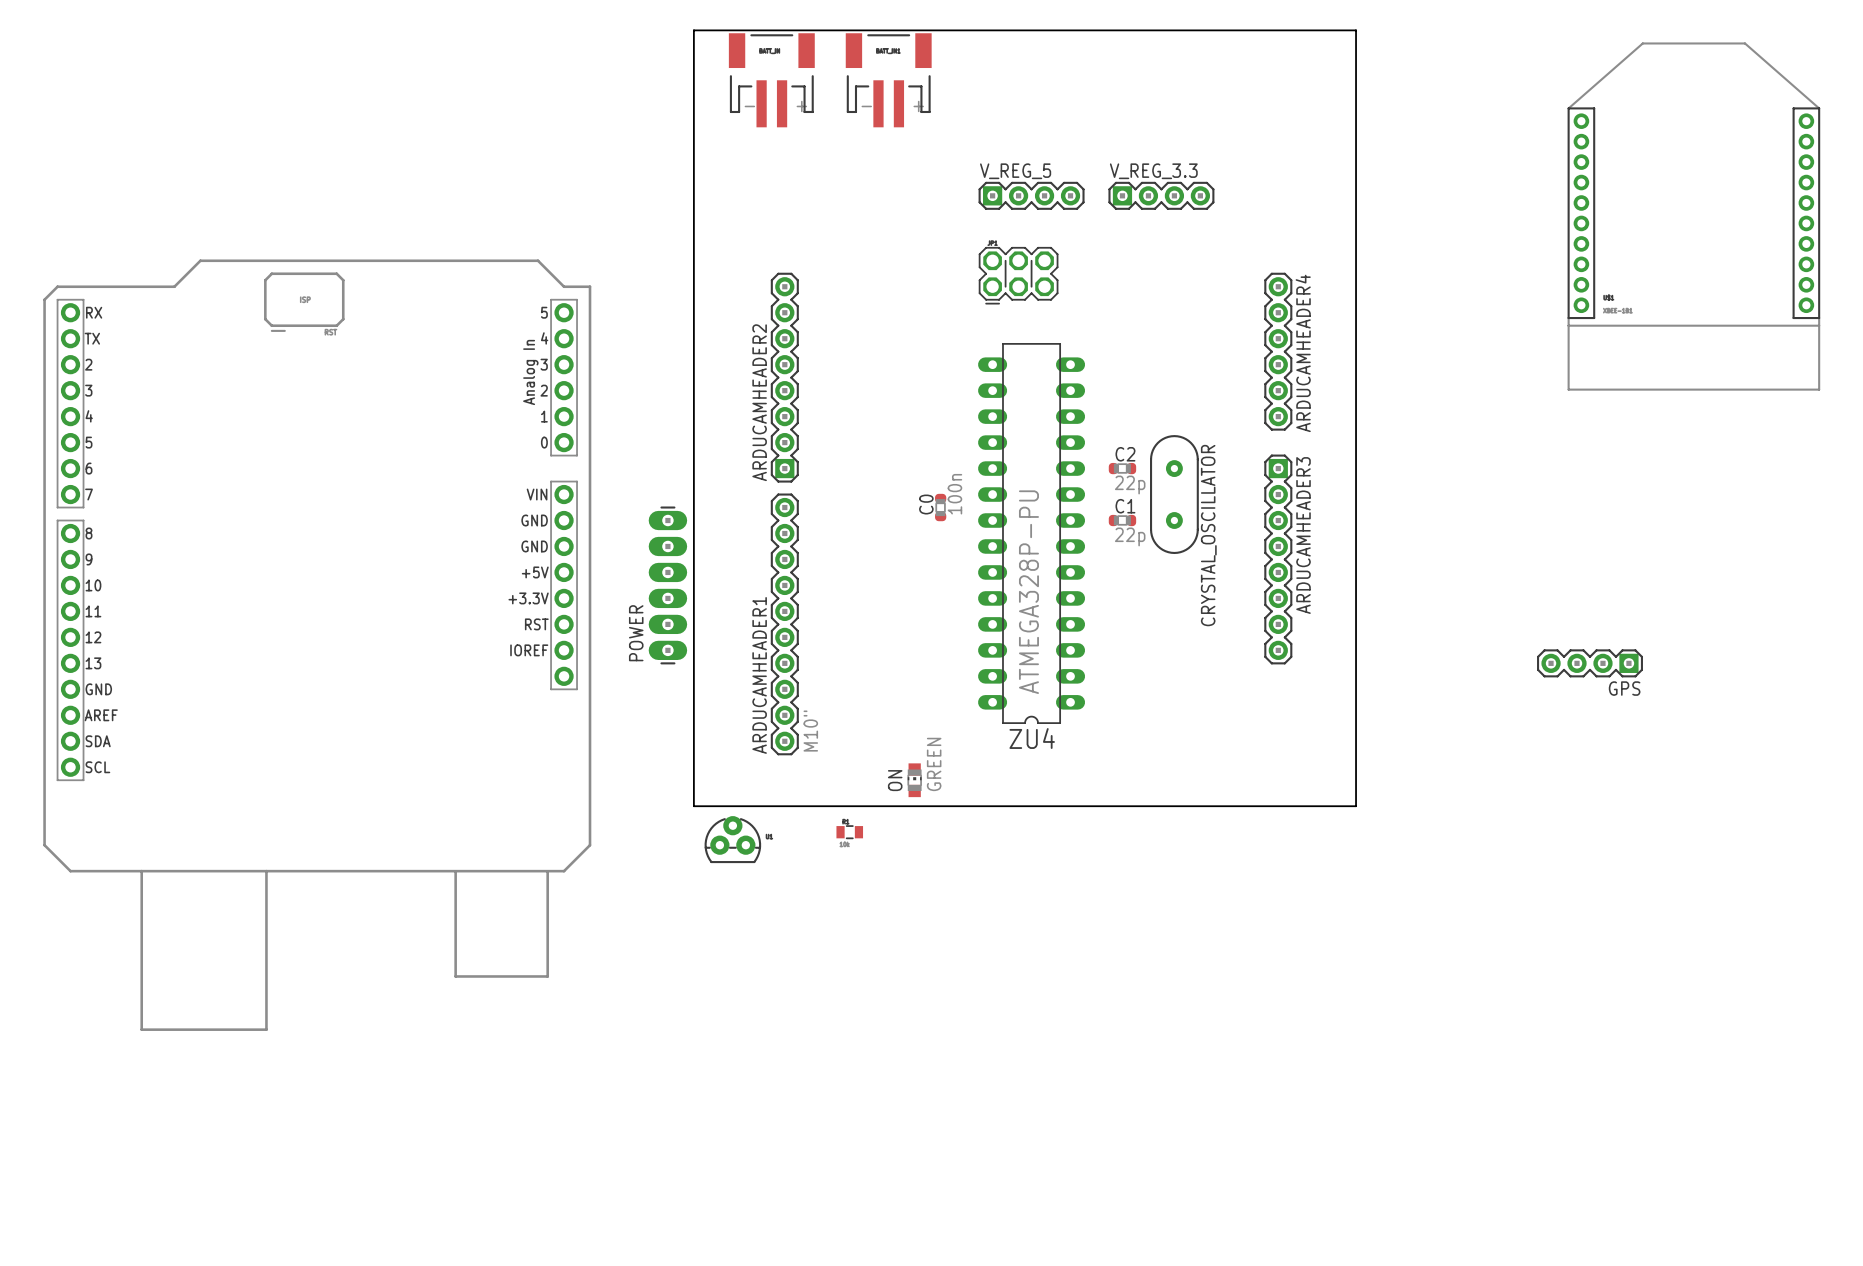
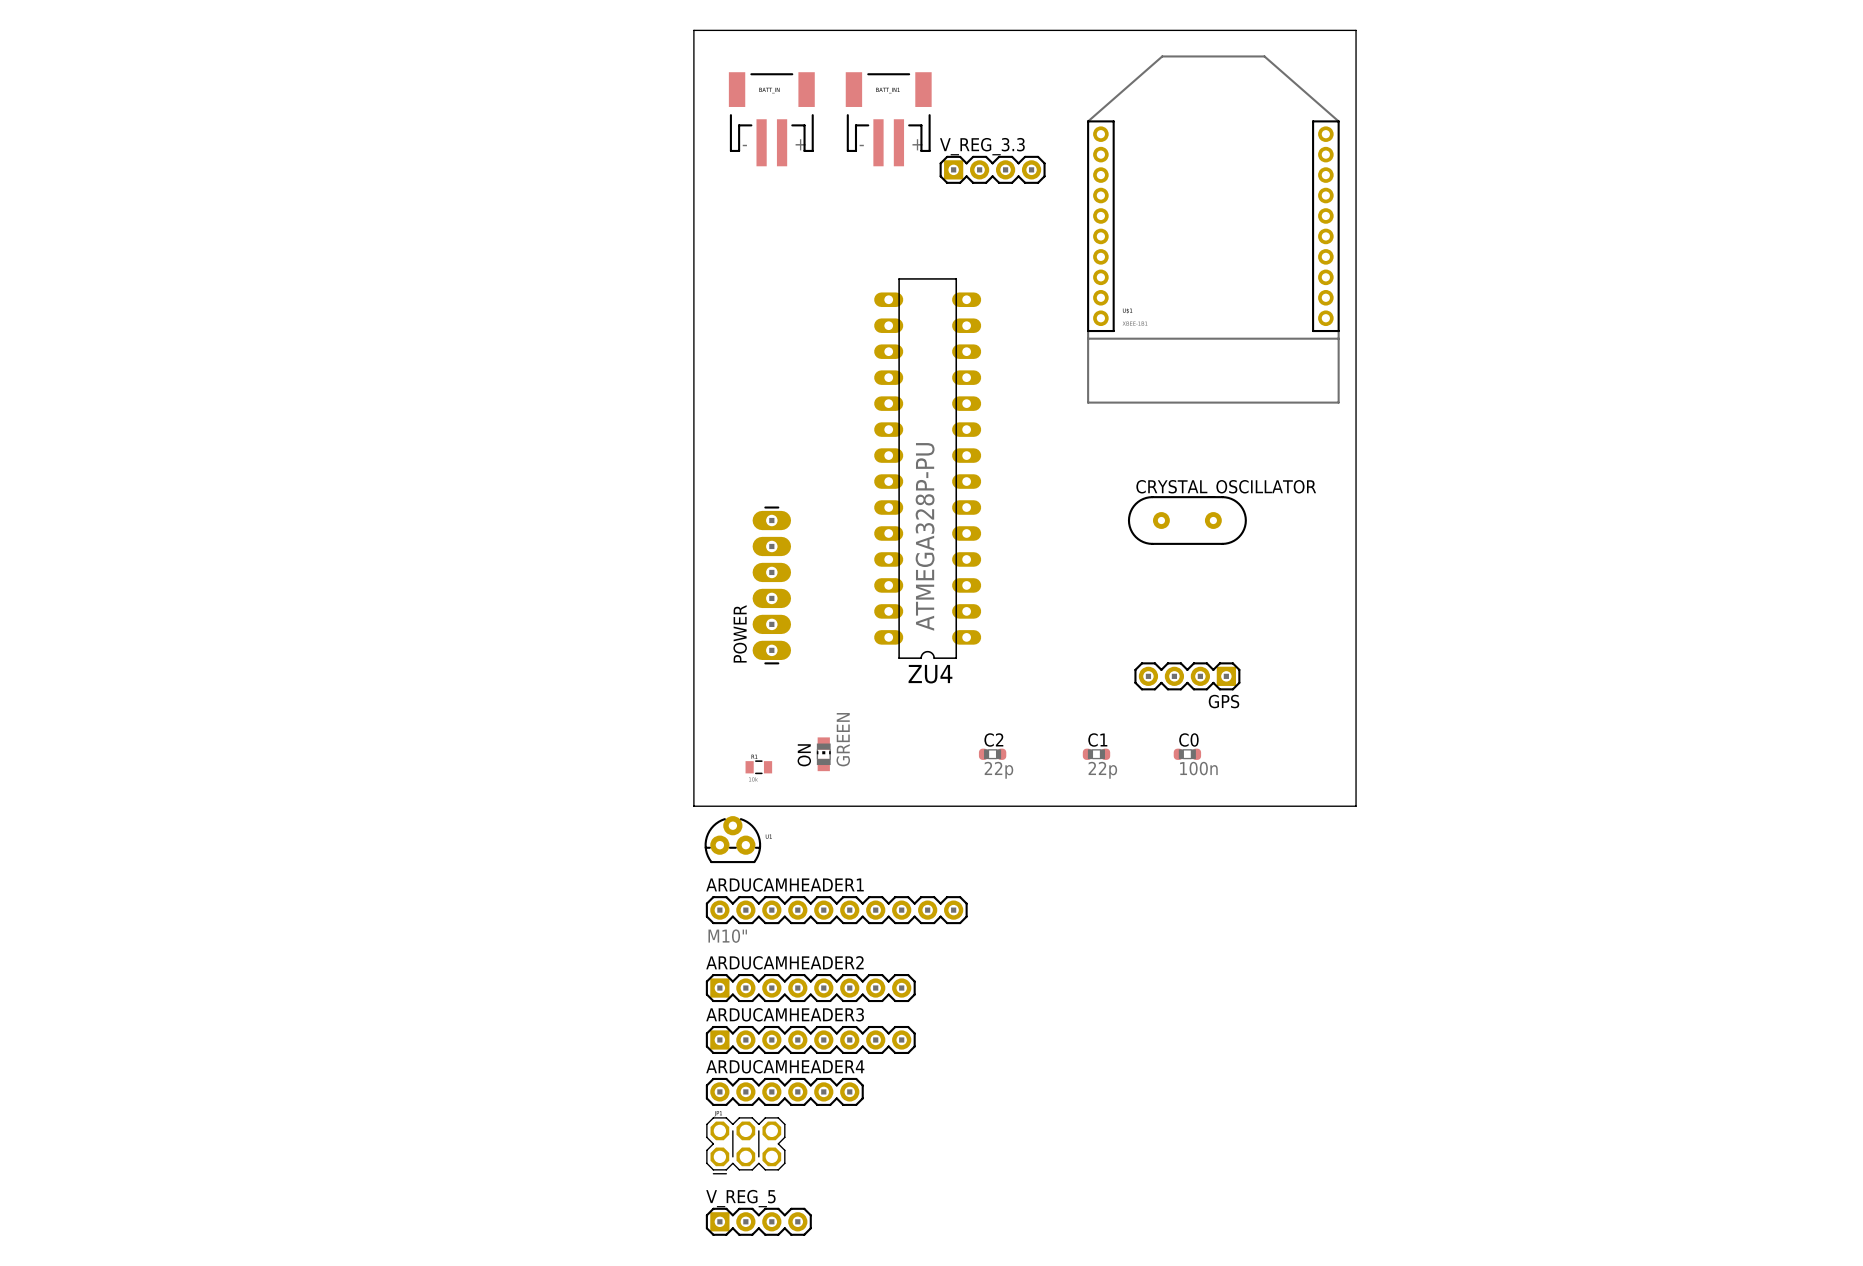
part position: (771, 80) -> (771, 119)
part position: (888, 80) -> (888, 119)
V_REG_5 position: (1031, 195) -> (758, 1221)
V_REG_3.3 position: (1161, 195) -> (992, 169)
part position: (1693, 216) -> (1213, 229)
part position: (1018, 275) -> (745, 1145)
ARDUCAMHEADER4 rotation: 0° (1278, 351) -> 90° clockwise (784, 1091)
ARDUCAMHEADER4 position: (1278, 351) -> (784, 1091)
ARDUCAMHEADER4 name position: ARDUCAMHEADER4 (1303, 353) -> ARDUCAMHEADER4 (785, 1066)
ARDUCAMHEADER2 rotation: 0° (784, 377) -> 90° clockwise (810, 988)
ARDUCAMHEADER2 position: (784, 377) -> (810, 988)
C2 position: (1122, 468) -> (992, 754)
CRYSTAL_OSCILLATOR rotation: 0° (1174, 494) -> 90° clockwise (1187, 520)
C0 rotation: 0° (940, 507) -> 90° clockwise (1187, 754)
C0 position: (940, 507) -> (1187, 754)
C1 position: (1122, 520) -> (1096, 754)
ZU4 position: (1031, 533) -> (927, 468)
CRYSTAL_OSCILLATOR name position: CRYSTAL_OSCILLATOR (1208, 535) -> CRYSTAL_OSCILLATOR (1226, 488)
ARDUCAMHEADER3 rotation: 0° (1278, 559) -> 90° counterclockwise (810, 1039)
ARDUCAMHEADER3 position: (1278, 559) -> (810, 1039)
POWER position: (667, 585) -> (771, 585)
ARDUCAMHEADER1 rotation: 0° (784, 624) -> 90° clockwise (836, 910)
ARDUCAMHEADER1 position: (784, 624) -> (836, 910)
part: (317, 645) -> none
GPS: (1590, 663) -> none
GPS: none -> (1187, 676)
ON position: (914, 780) -> (823, 754)
part position: (849, 832) -> (758, 767)

